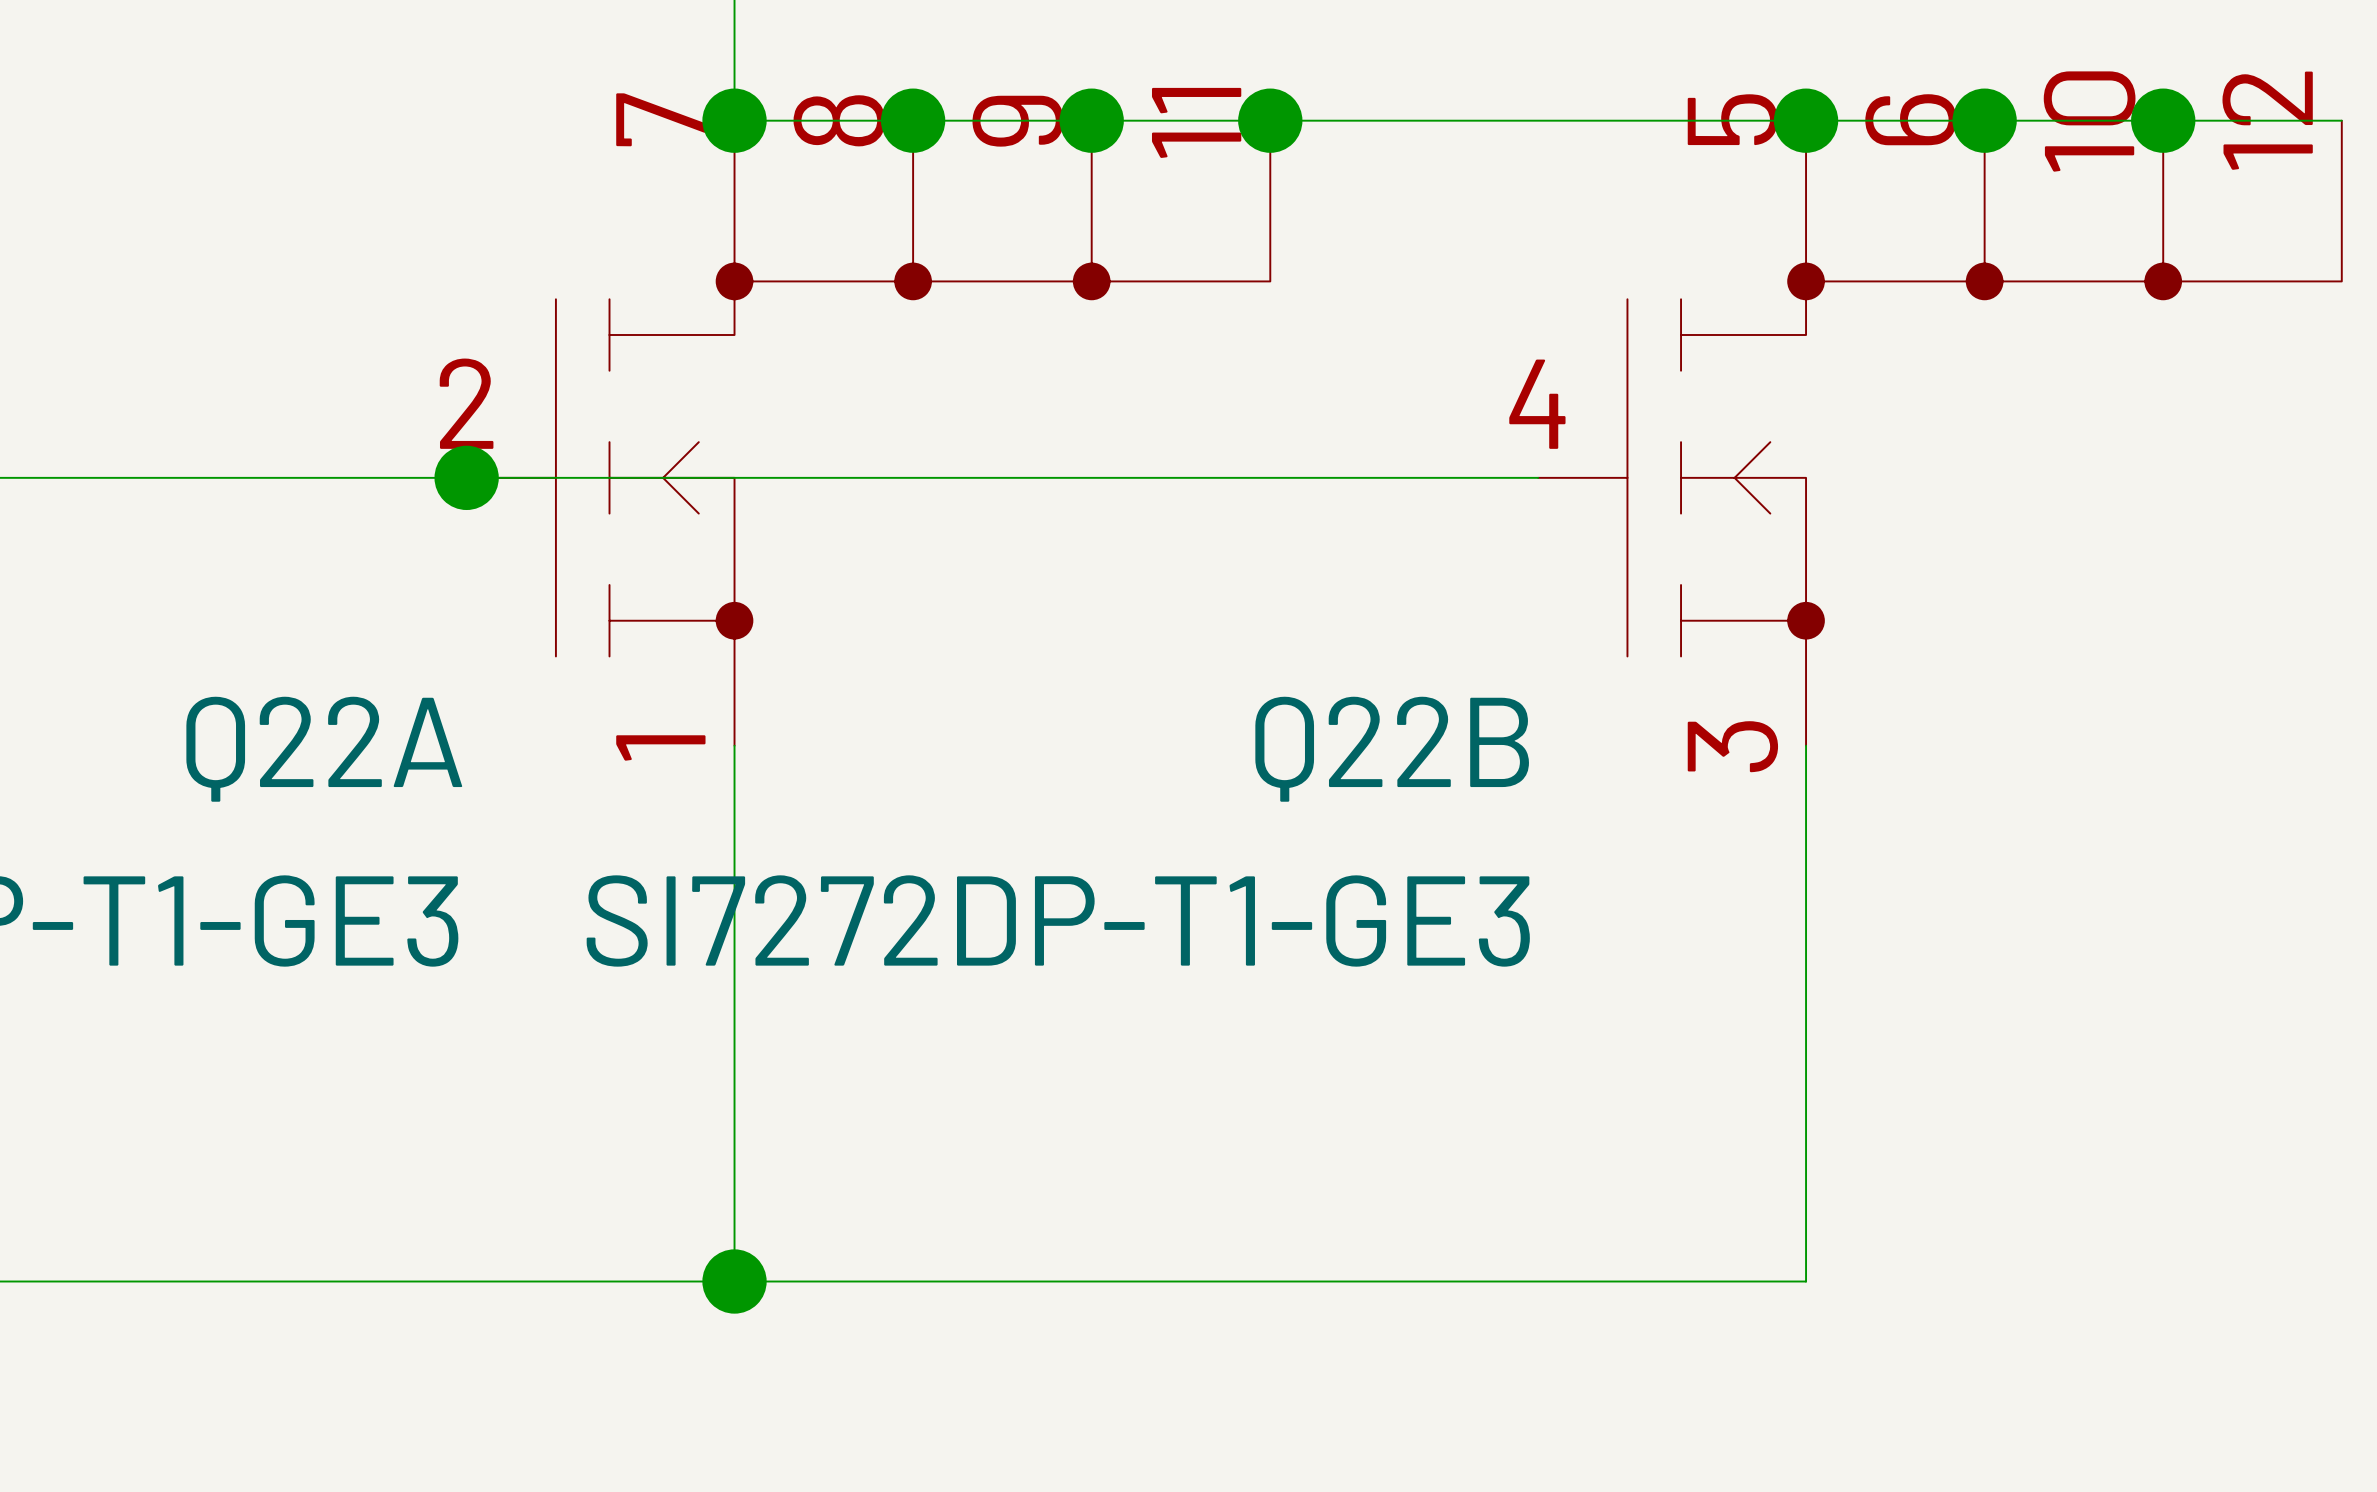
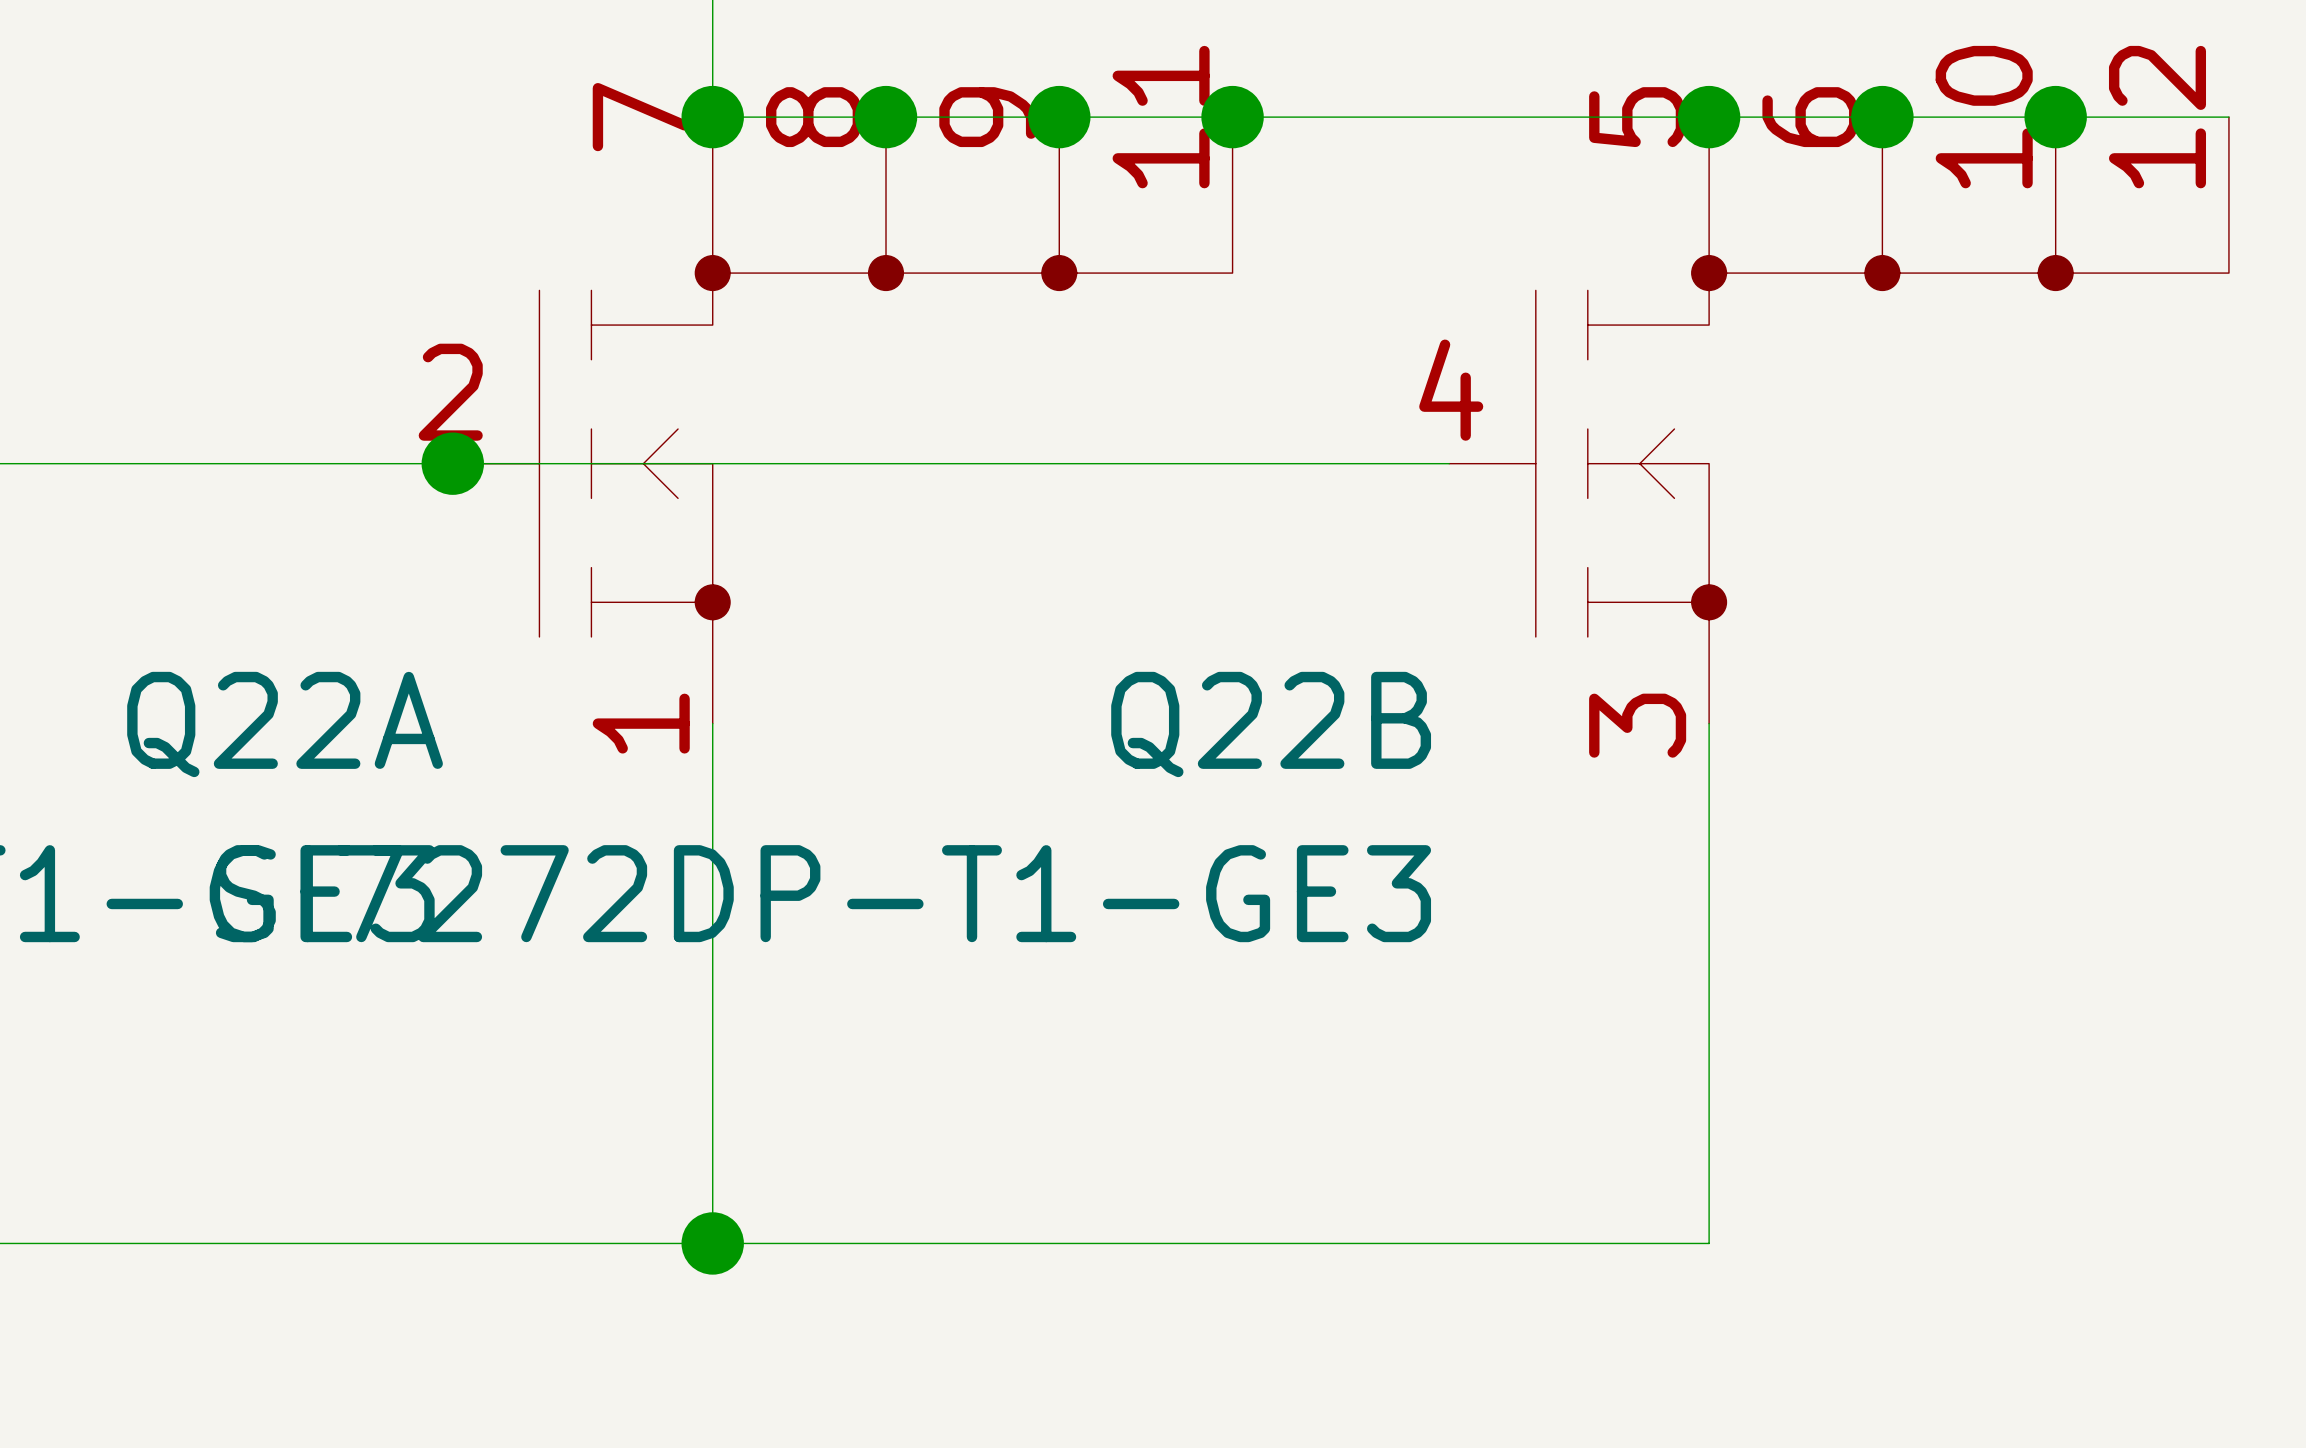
junction position: (1806, 120) -> (1709, 117)
junction position: (1984, 120) -> (1882, 117)
junction position: (2163, 120) -> (2055, 117)
wire: (2297, 120) (2341, 120) -> none
Q22B position: (1939, 433) -> (1839, 420)
wire: (1806, 745) (1806, 1281) (1761, 1281) -> (1709, 723) (1709, 1243)

